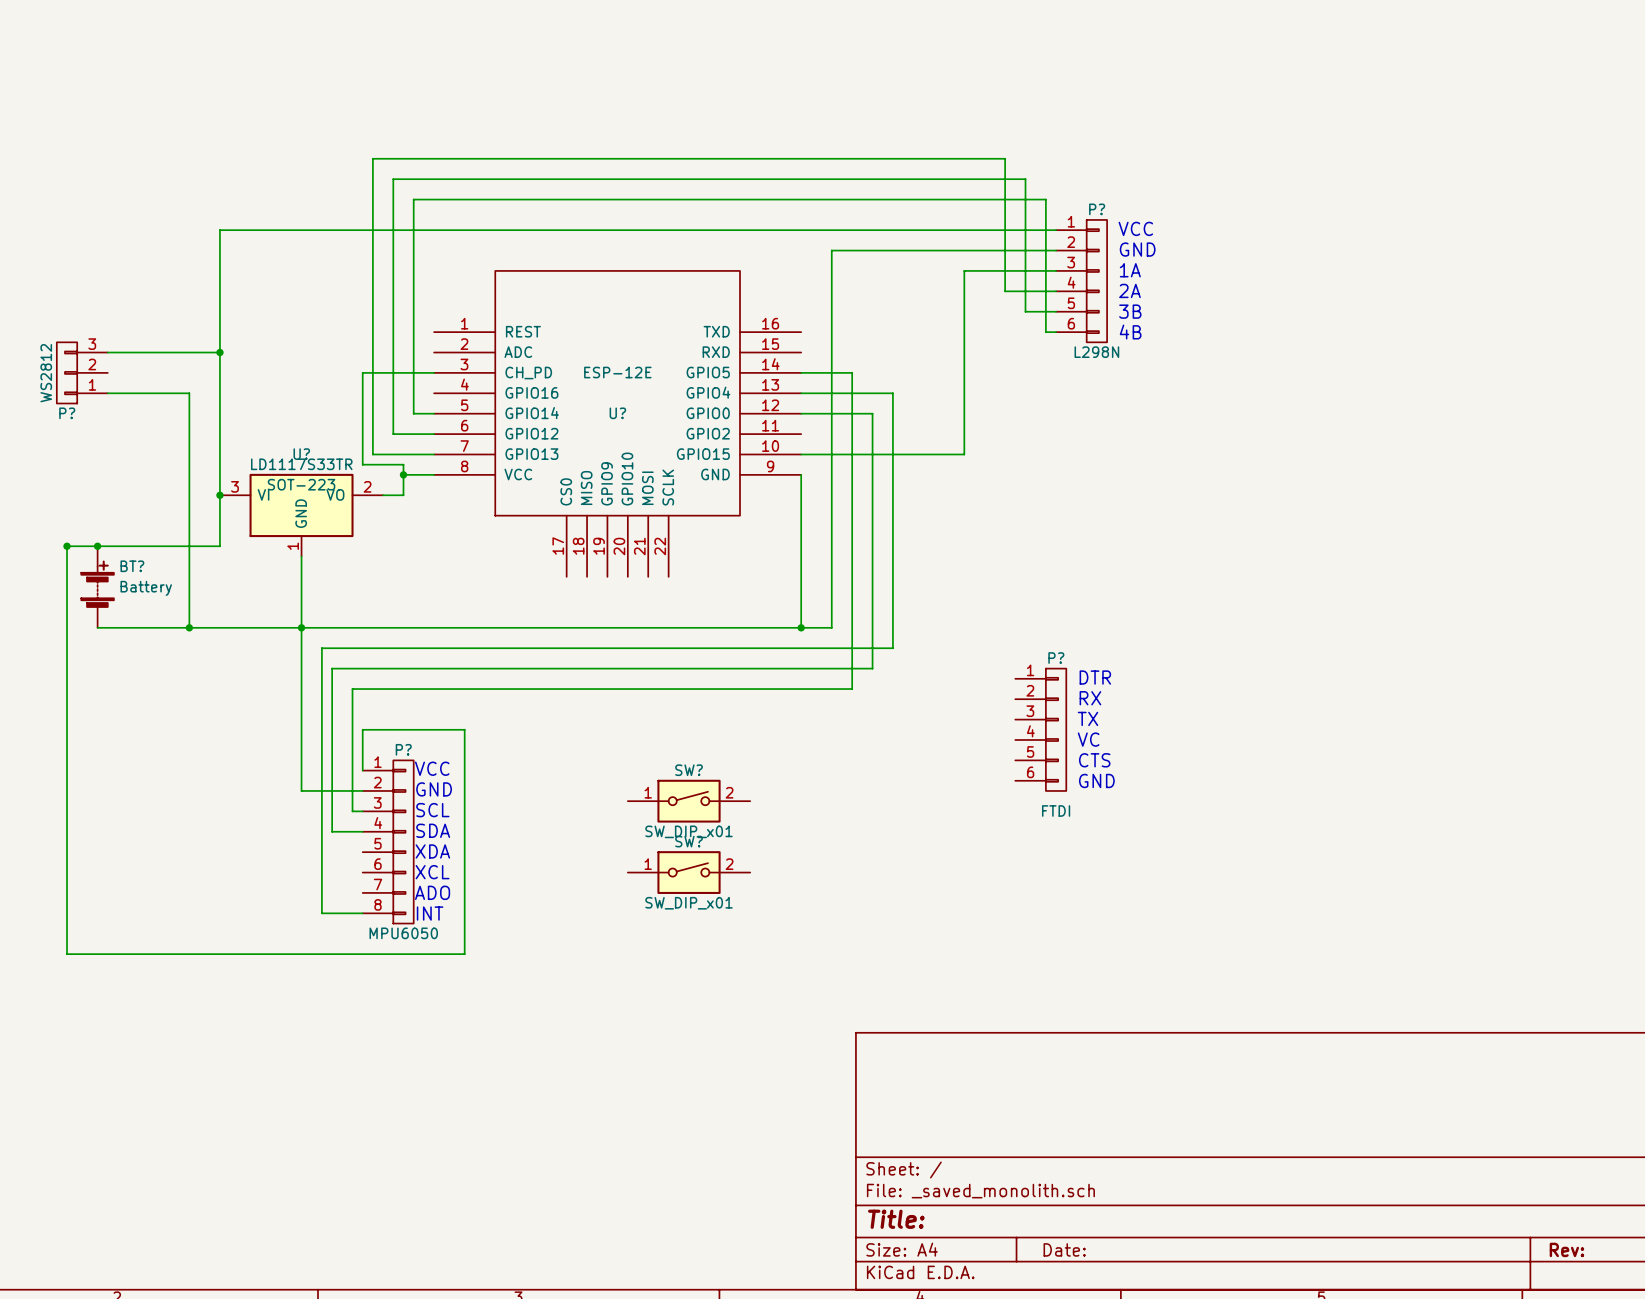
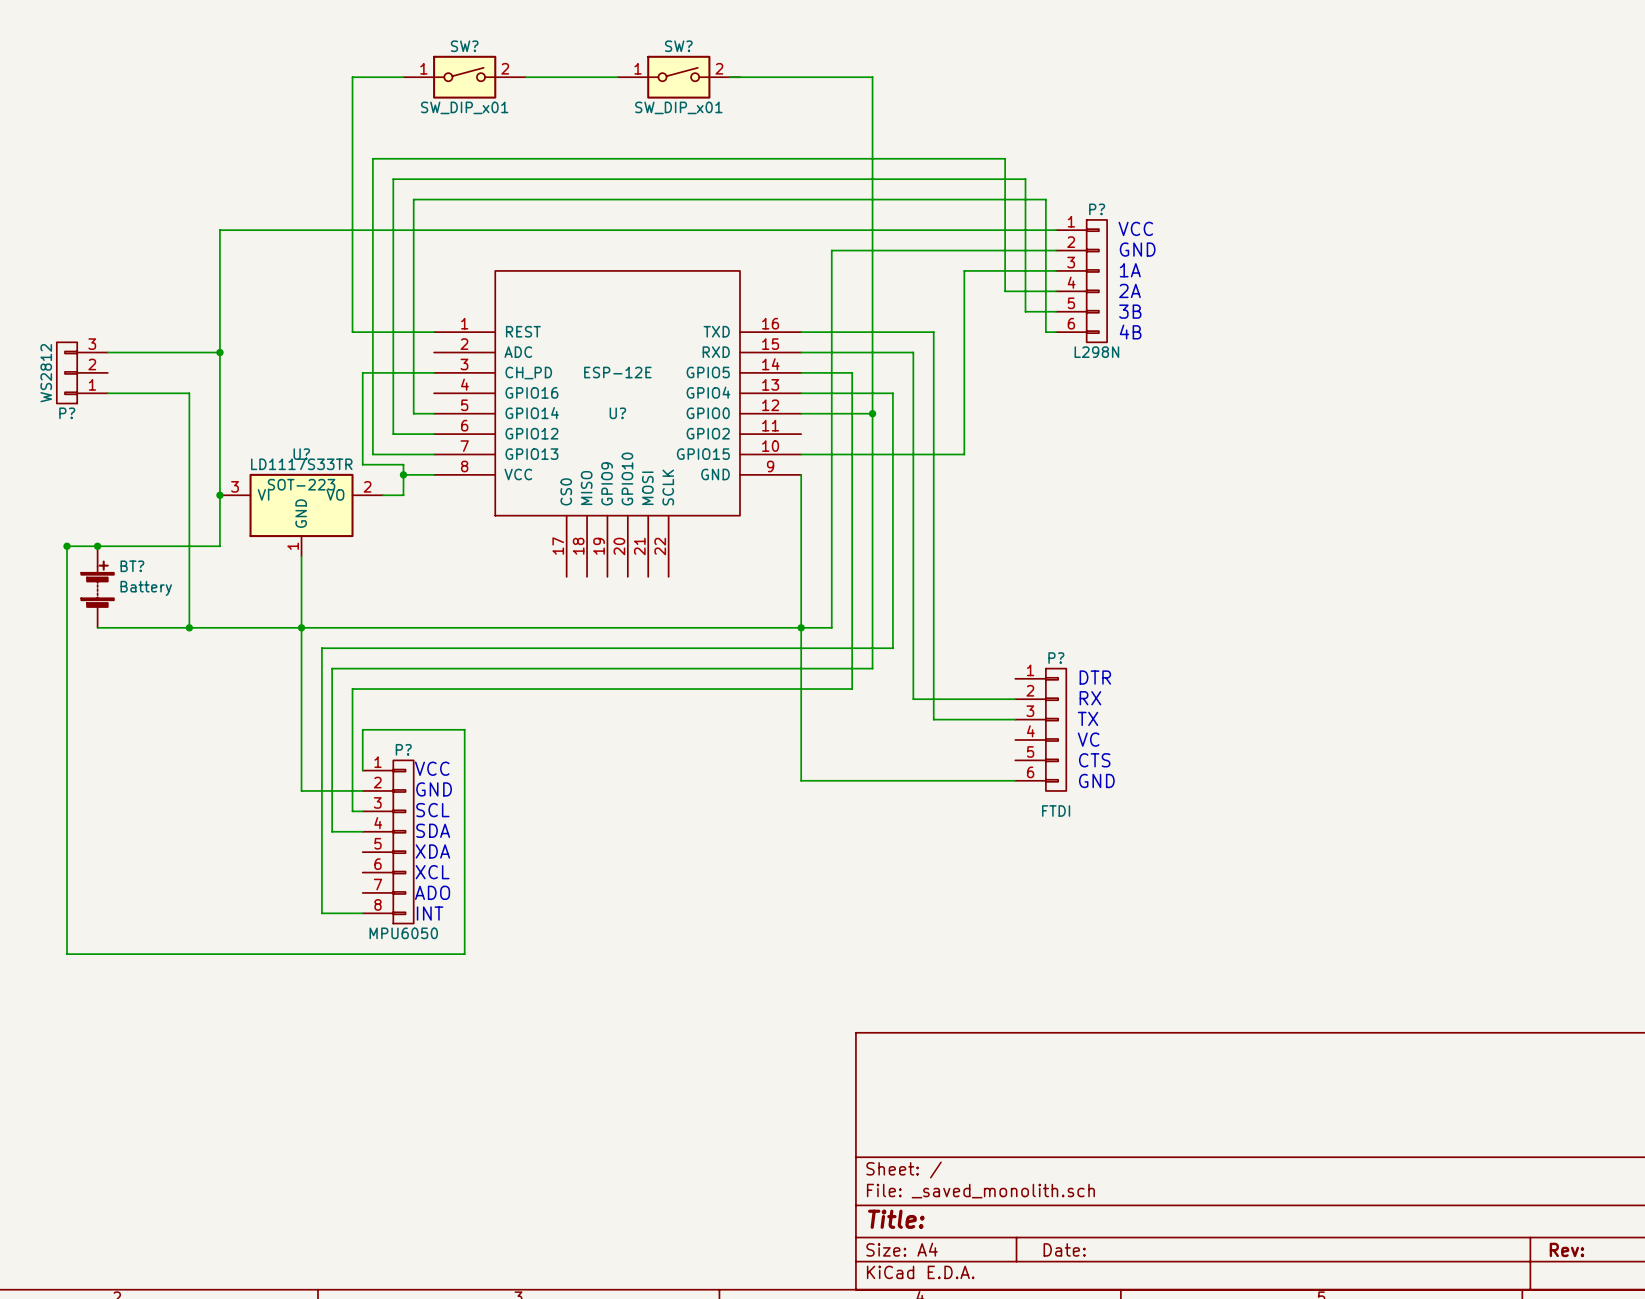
wire: none -> (403, 77) (352, 77) (352, 332) (434, 332)
SW?: none -> SW_DIP_x01 (464, 77)
wire: none -> (525, 77) (617, 77)
SW?: none -> SW_DIP_x01 (678, 77)
wire: none -> (729, 77) (872, 77) (872, 413)
wire: none -> (801, 332) (933, 332) (933, 719) (1015, 719)
wire: none -> (801, 352) (913, 352) (913, 699) (1015, 699)
junction: none -> (872, 413)
wire: none -> (801, 627) (801, 780) (1015, 780)
SW?: SW_DIP_x01 (689, 801) -> none
SW?: SW_DIP_x01 (689, 872) -> none

